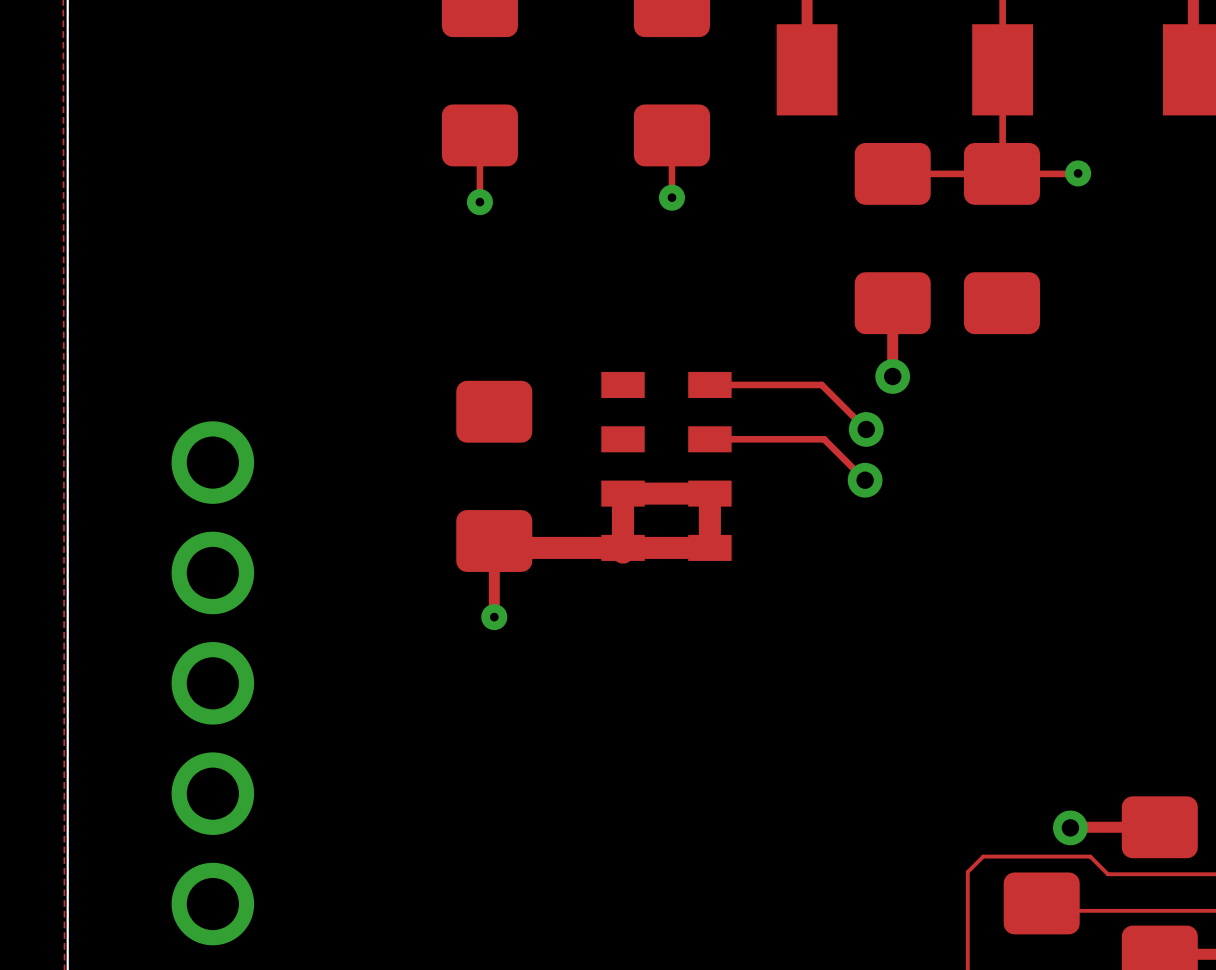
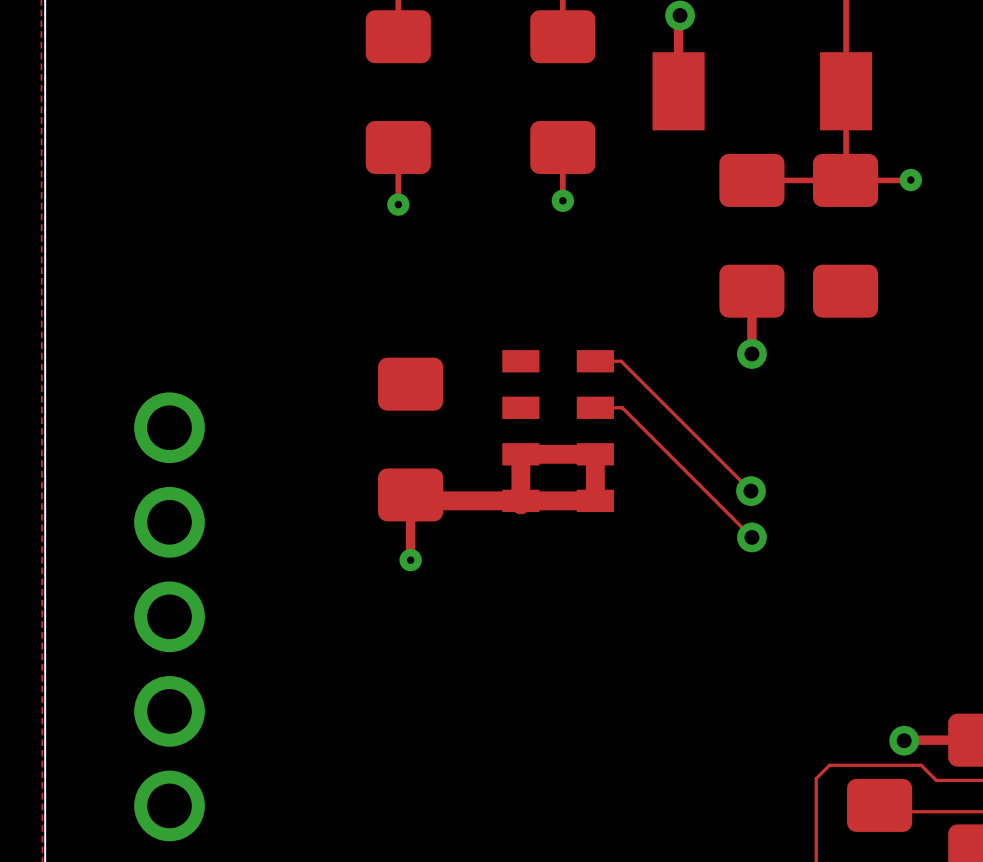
top track: (709, 384) (821, 384) (866, 429) -> none
top track: none -> (621, 361) (751, 491)
via: (866, 429) -> none
top track: (709, 439) (824, 439) (865, 480) -> none
top track: none -> (622, 407) (751, 537)
via: (865, 480) -> none
via: none -> (751, 491)
via: none -> (751, 537)

